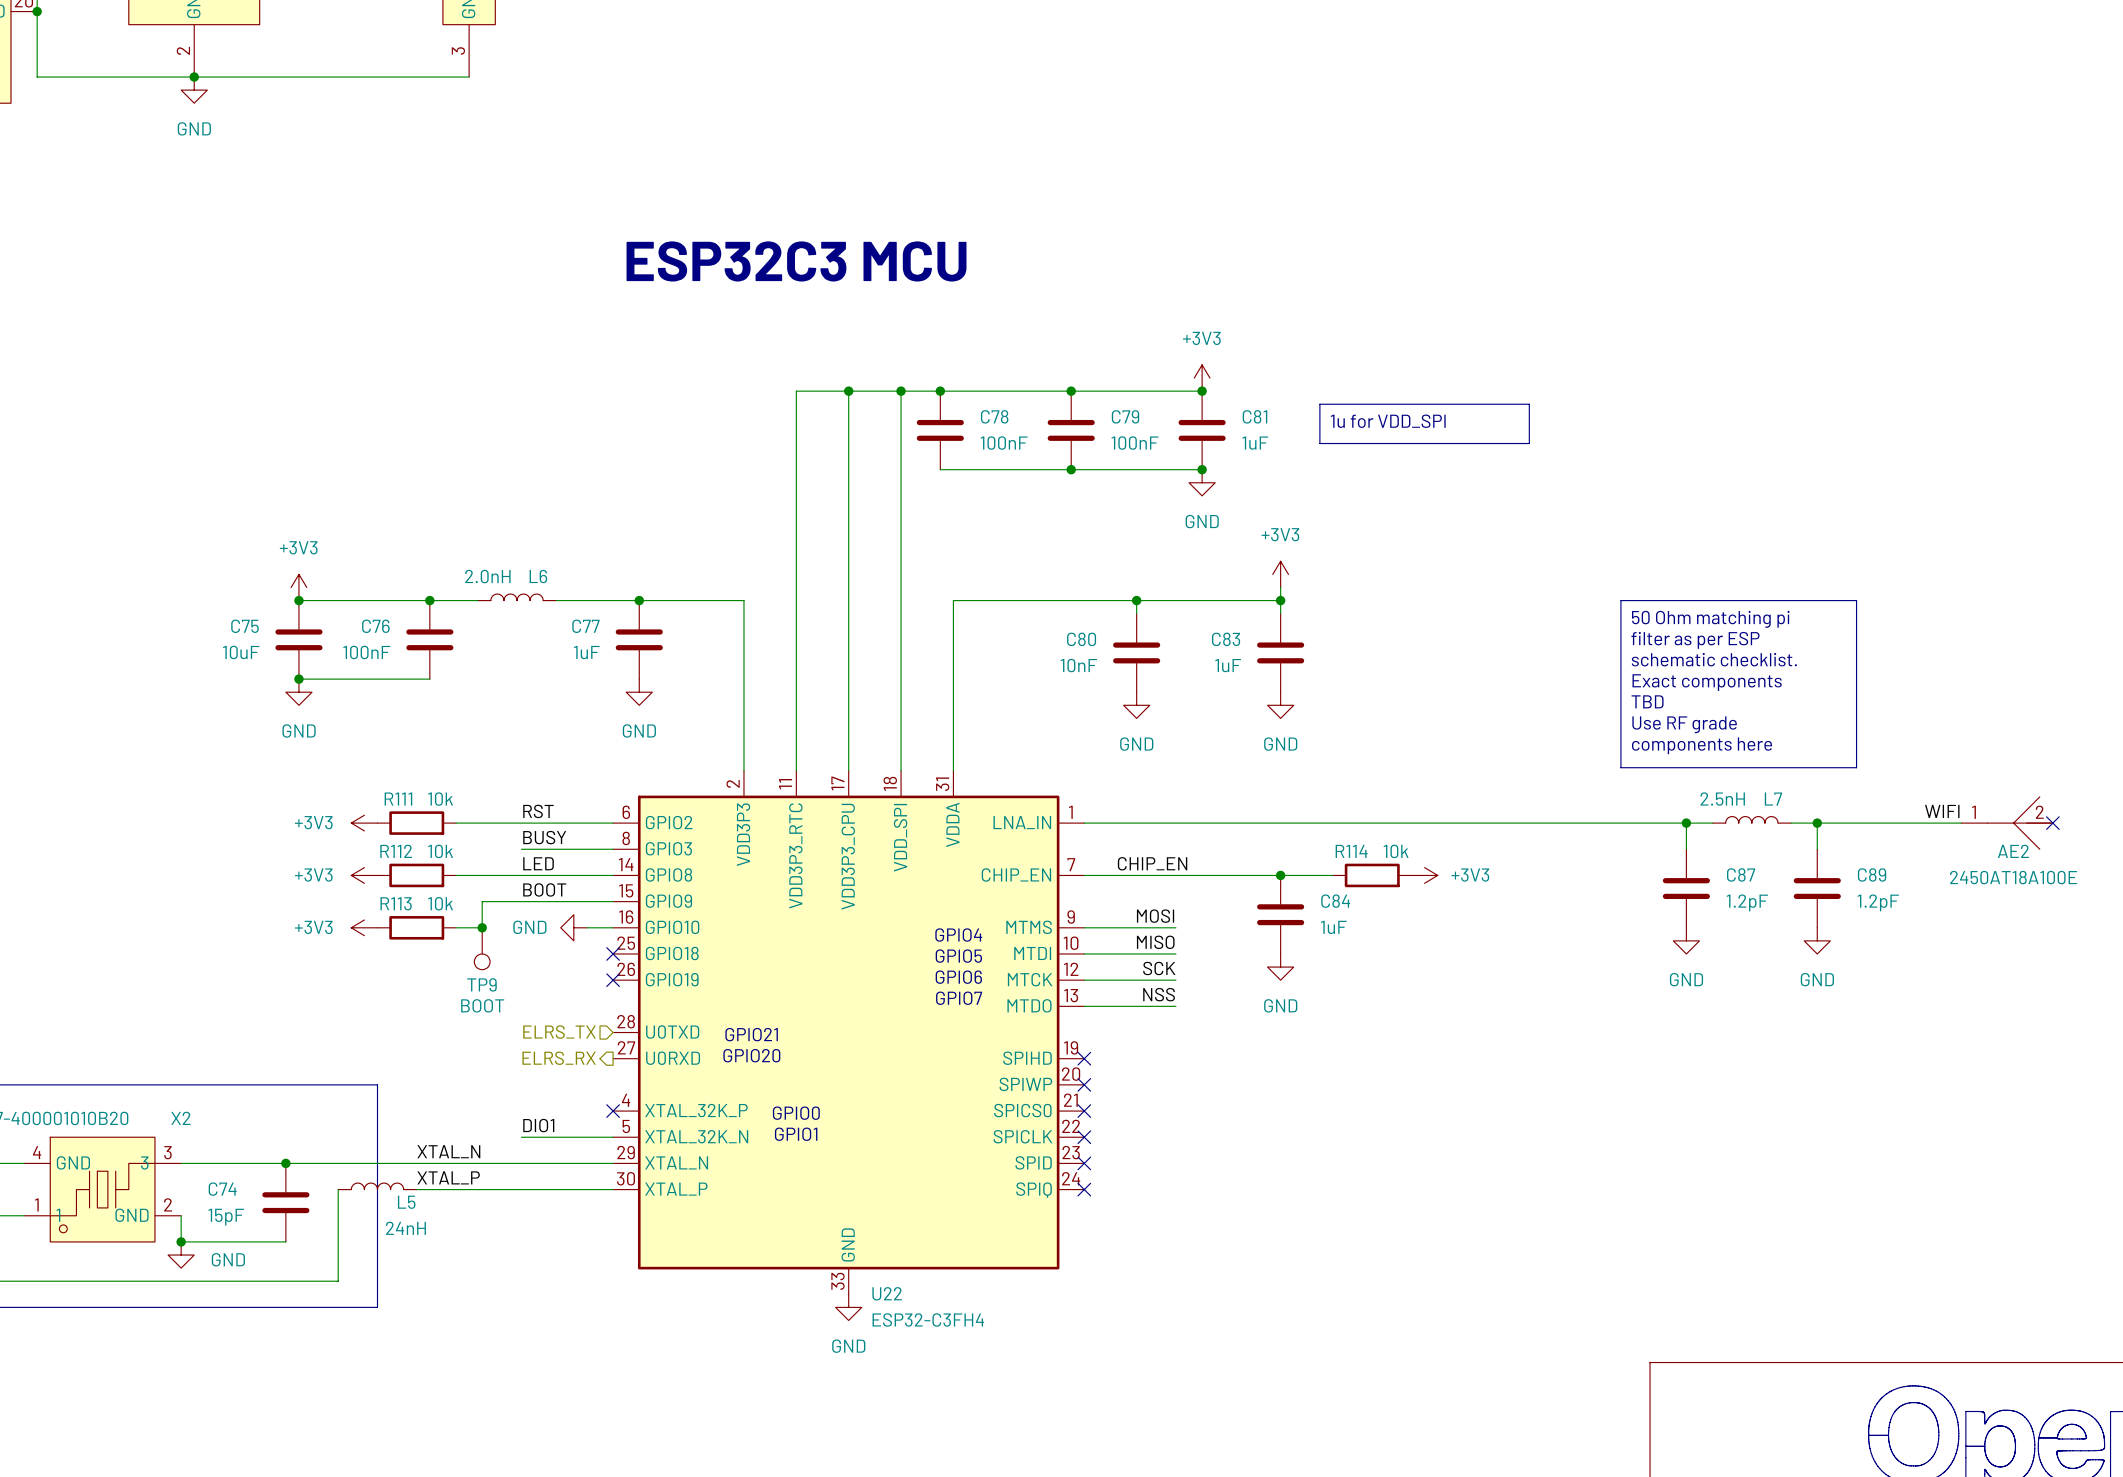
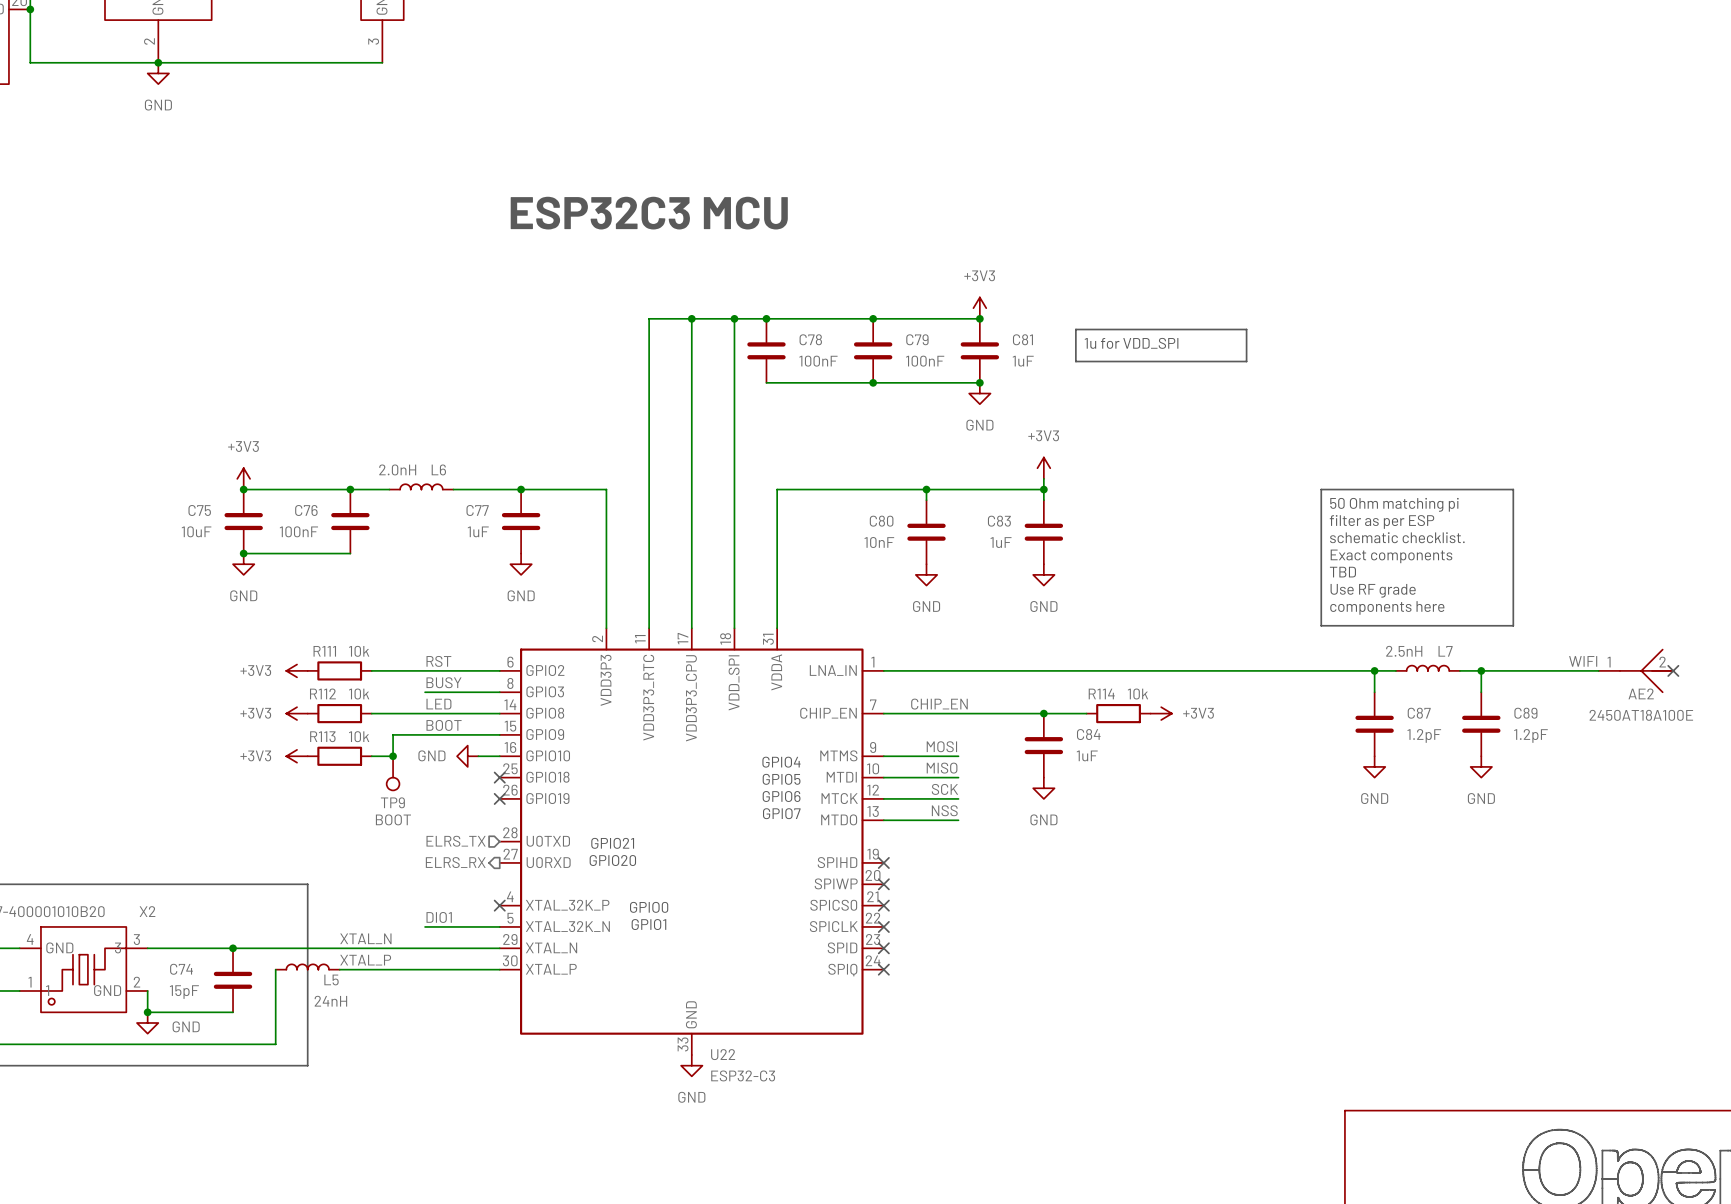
U22 value: ESP32-C3FH4 (928, 1320) -> ESP32-C3 (743, 1075)

